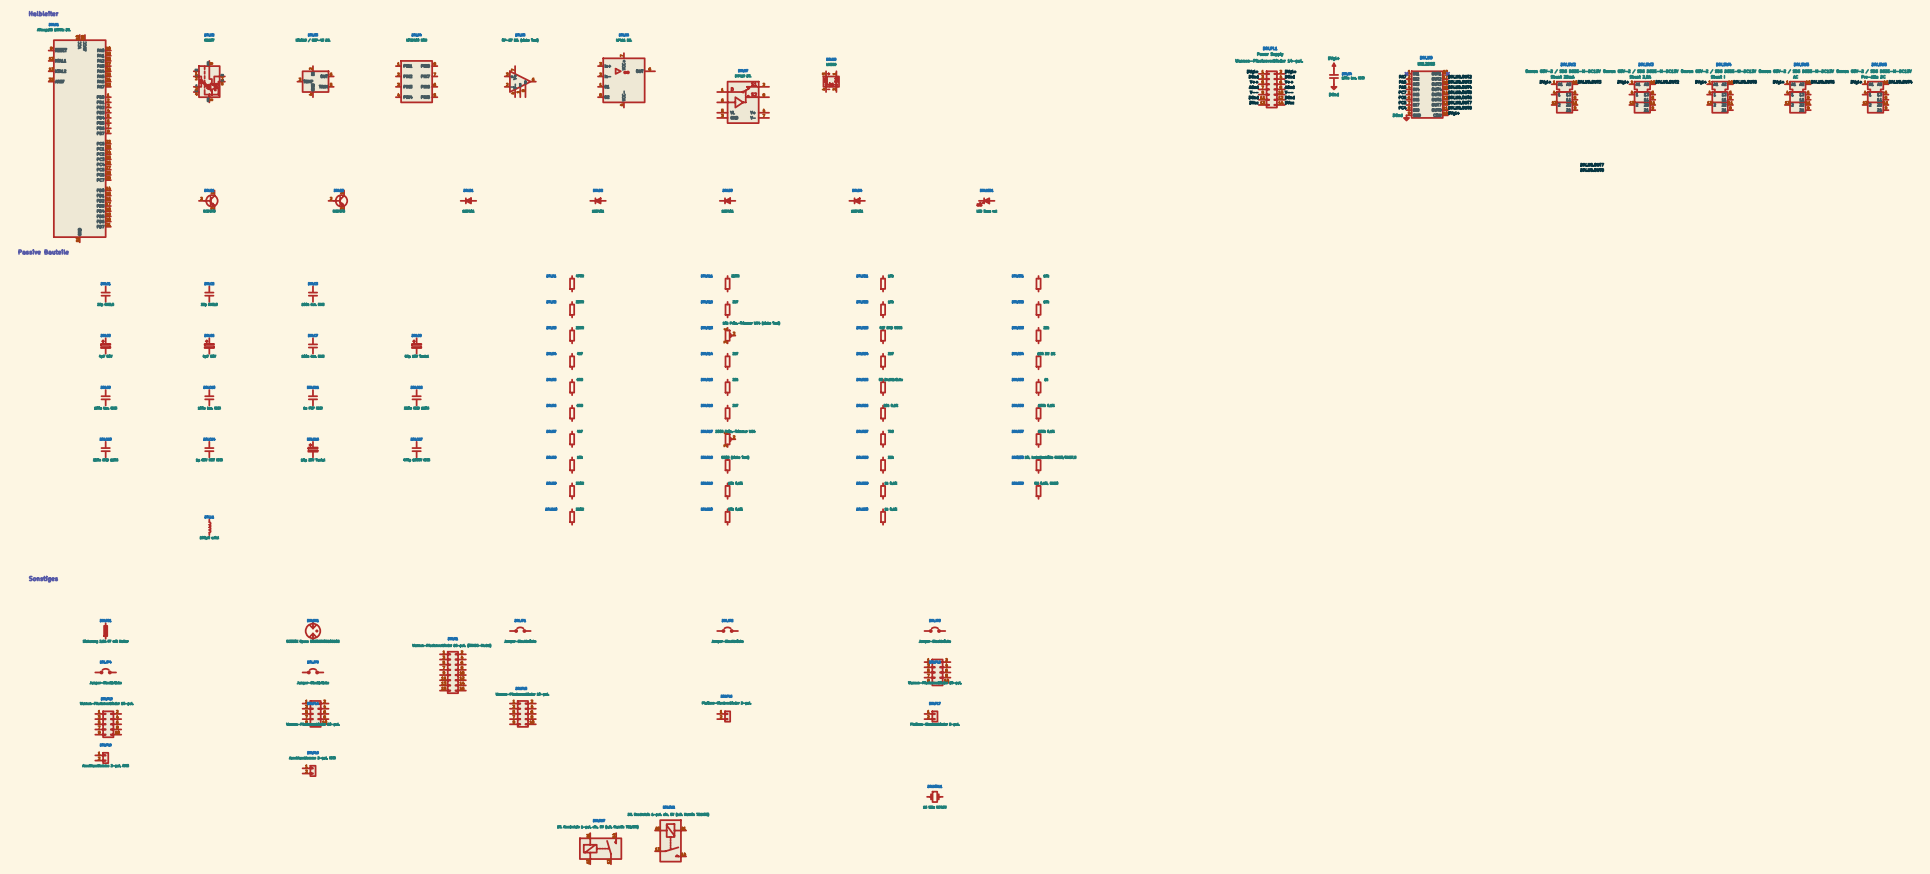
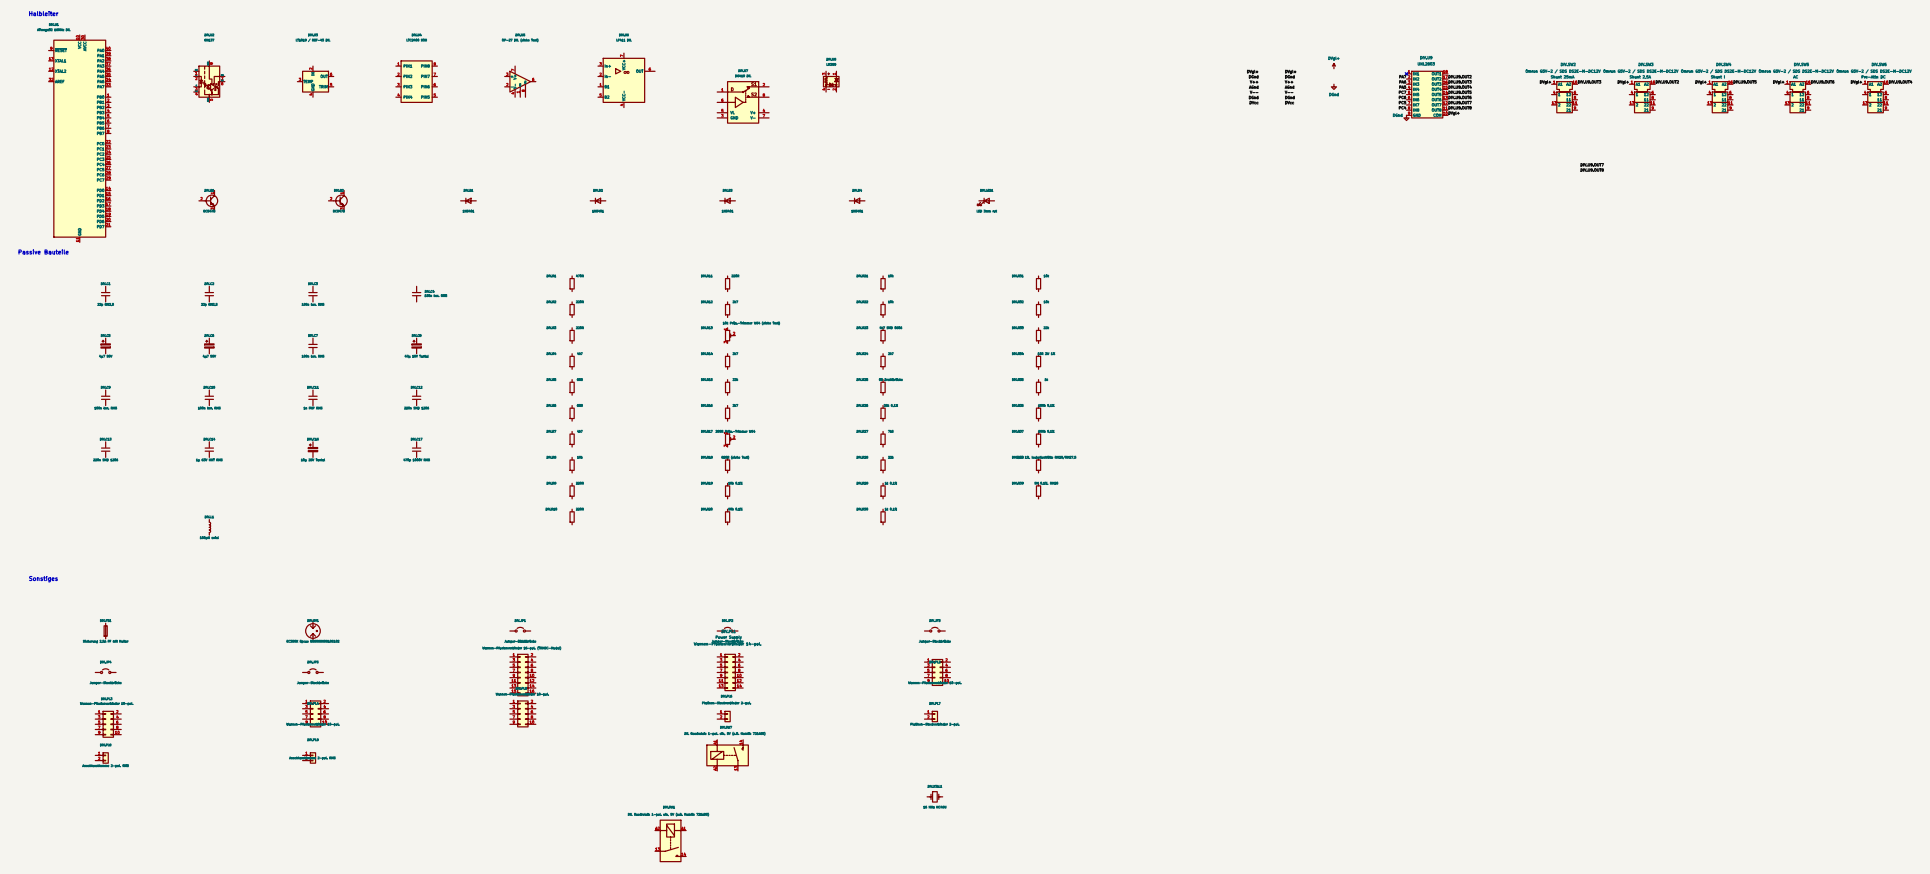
no-connect mark: (1447, 73) -> none
part position: (1333, 76) -> (416, 294)
part position: (1271, 89) -> (730, 672)
part position: (452, 672) -> (522, 675)
part position: (309, 770) -> (309, 757)
part position: (600, 848) -> (727, 755)

